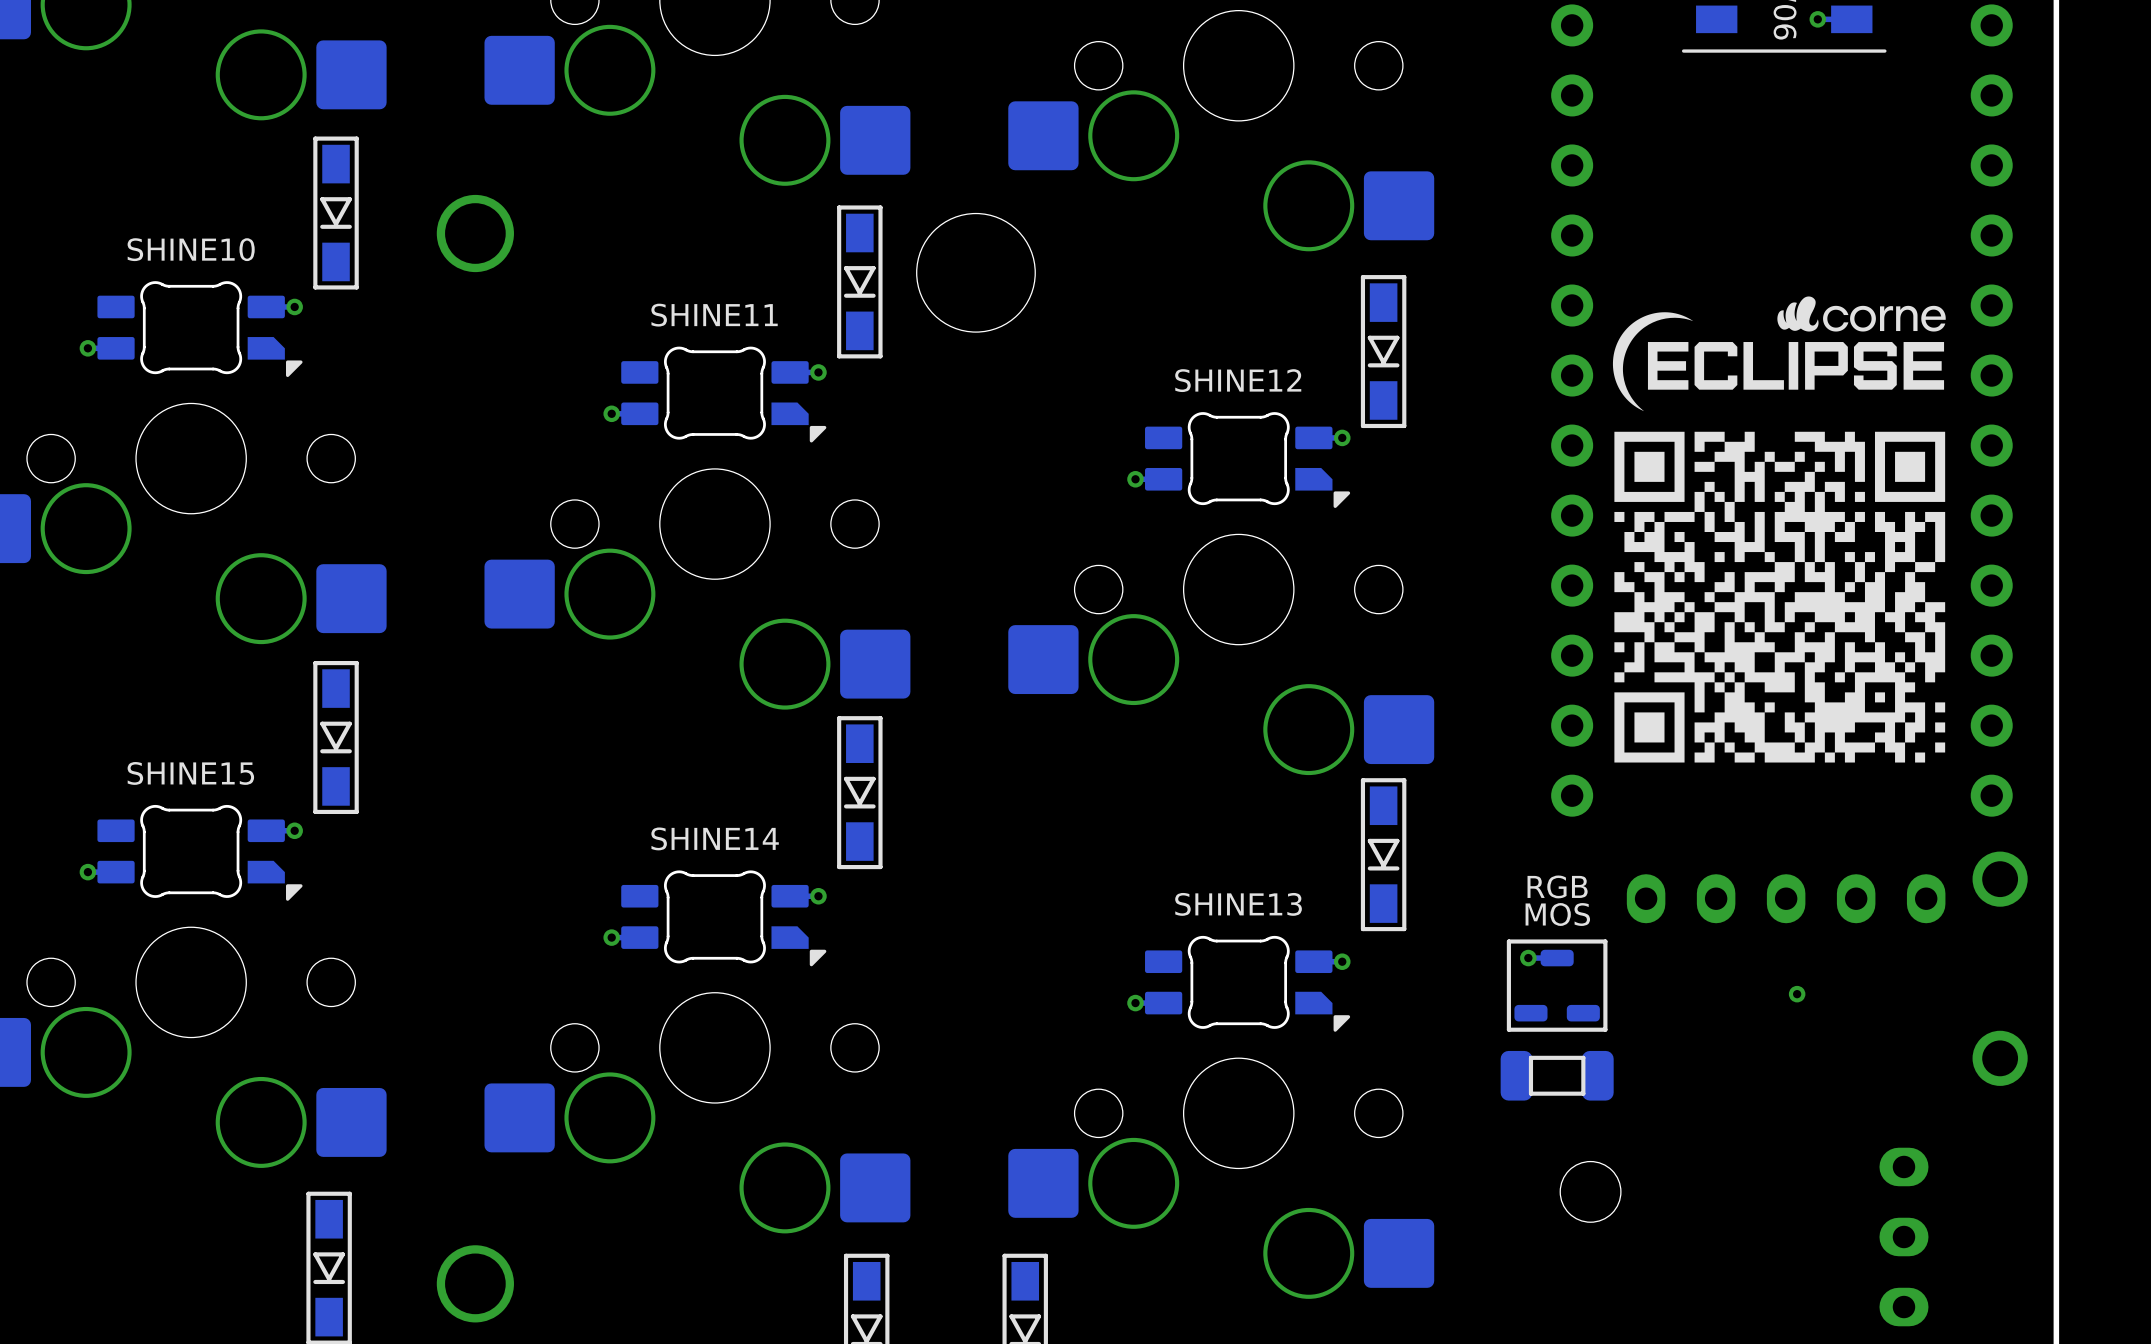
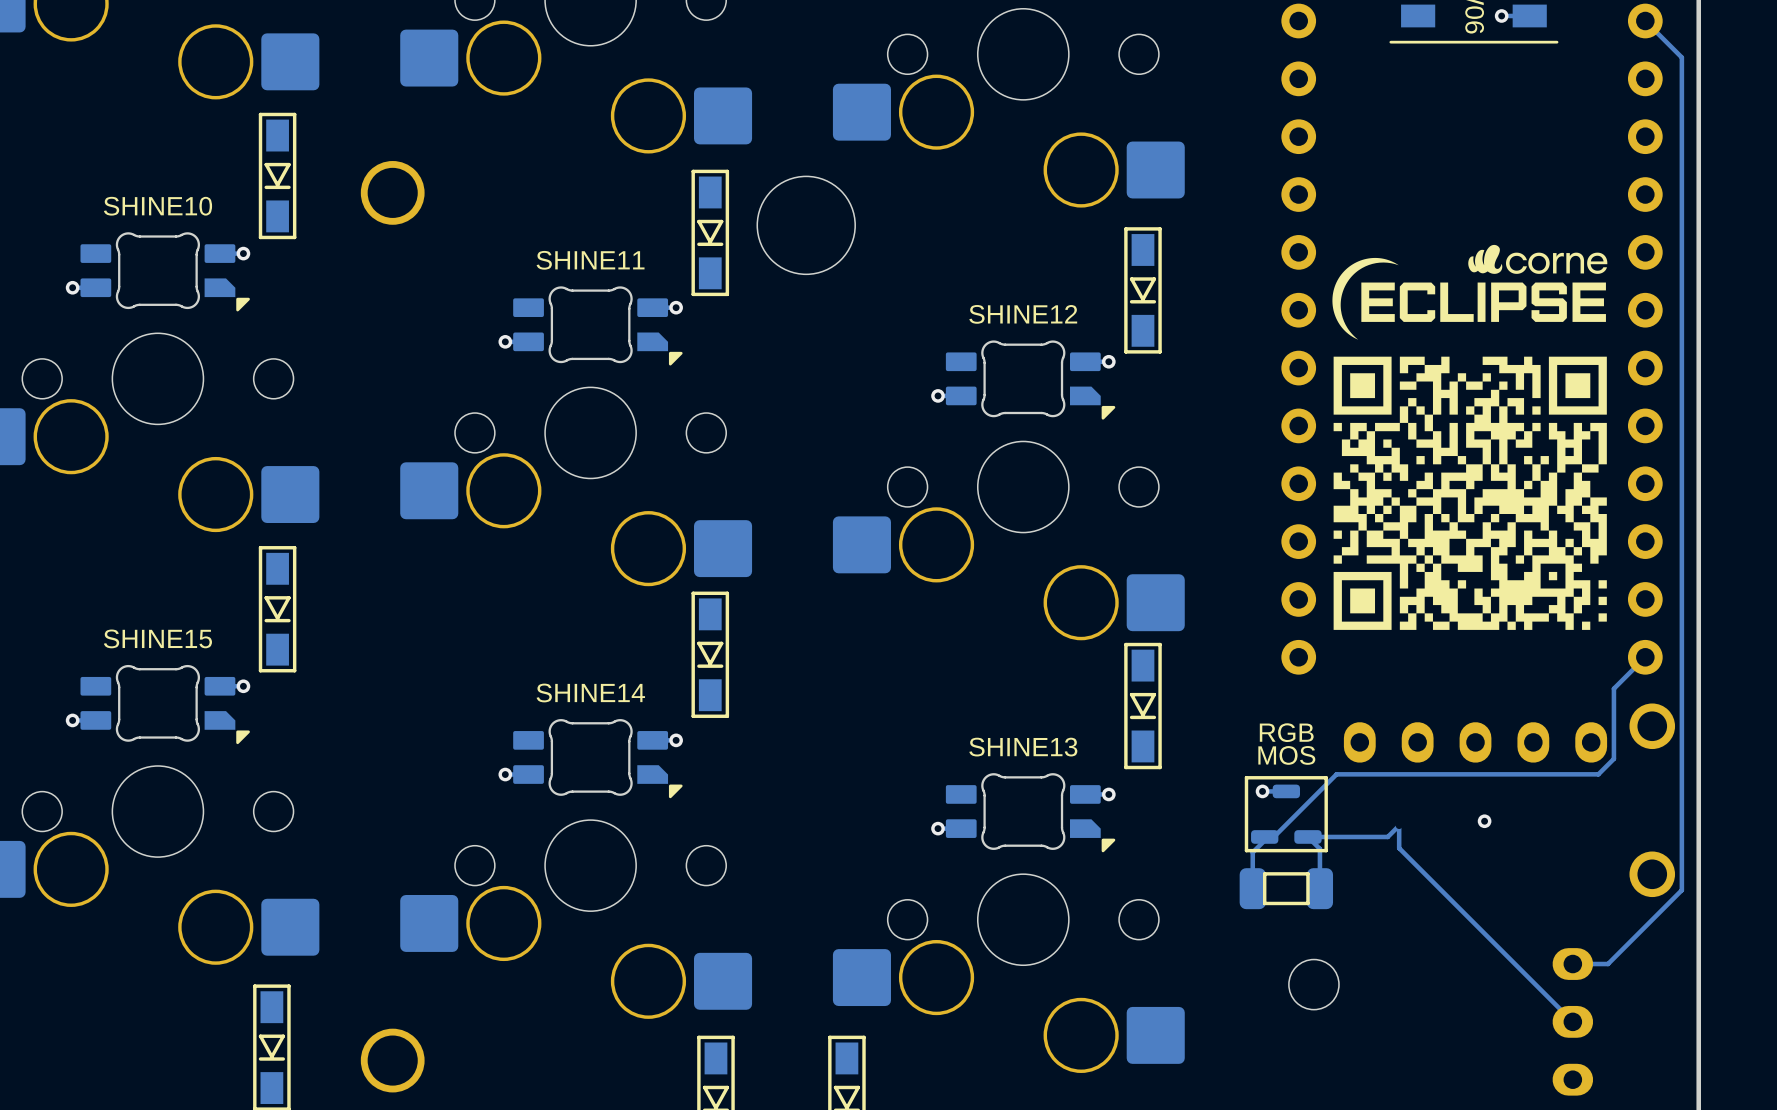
track: none -> (1645, 21) (1681, 57) (1681, 890) (1608, 964) (1572, 964)
track: none -> (1645, 657) (1613, 688) (1613, 758) (1598, 774) (1336, 774) (1273, 836) (1264, 836) (1264, 840) (1252, 852) (1252, 888)
via: none -> (1399, 825)
track: none -> (1319, 888) (1319, 848) (1307, 836) (1387, 836) (1399, 825) (1399, 848) (1572, 1021)

